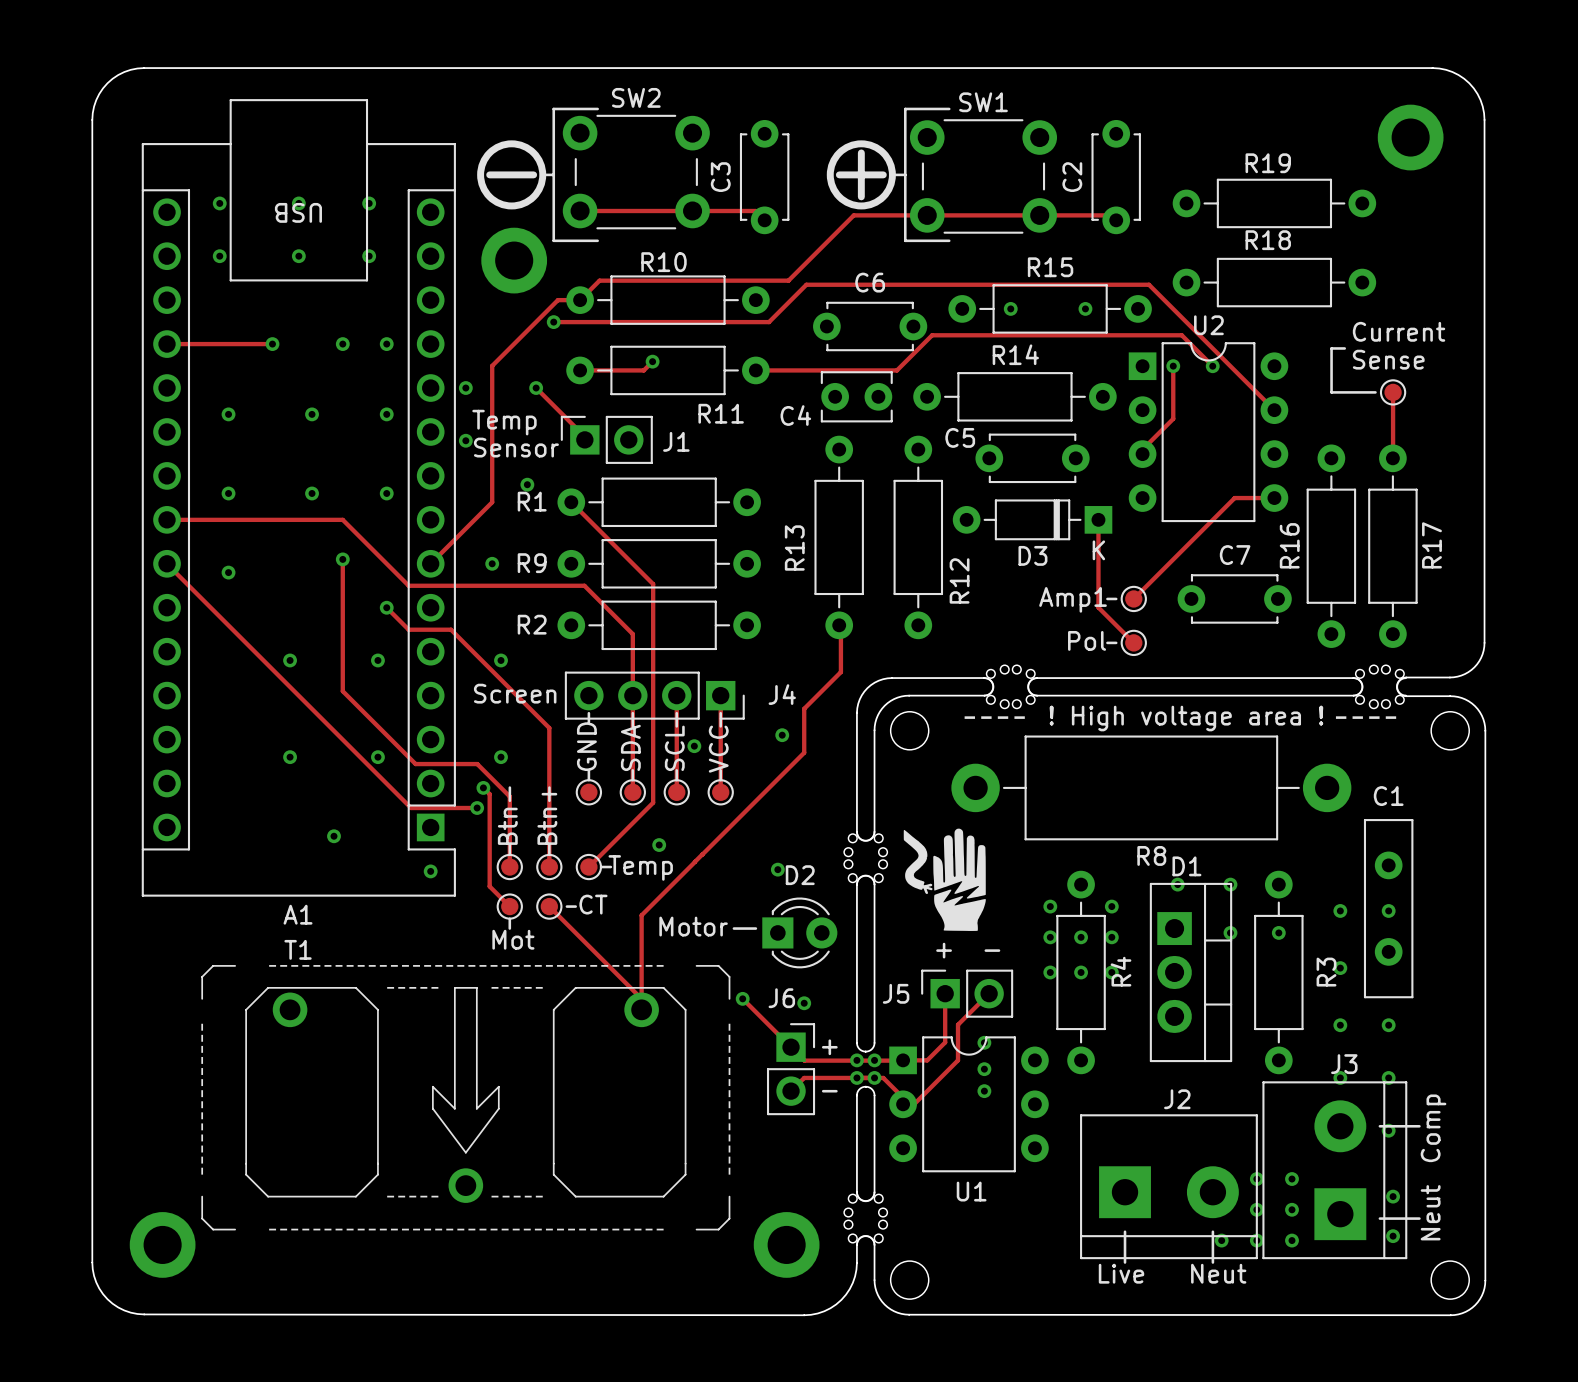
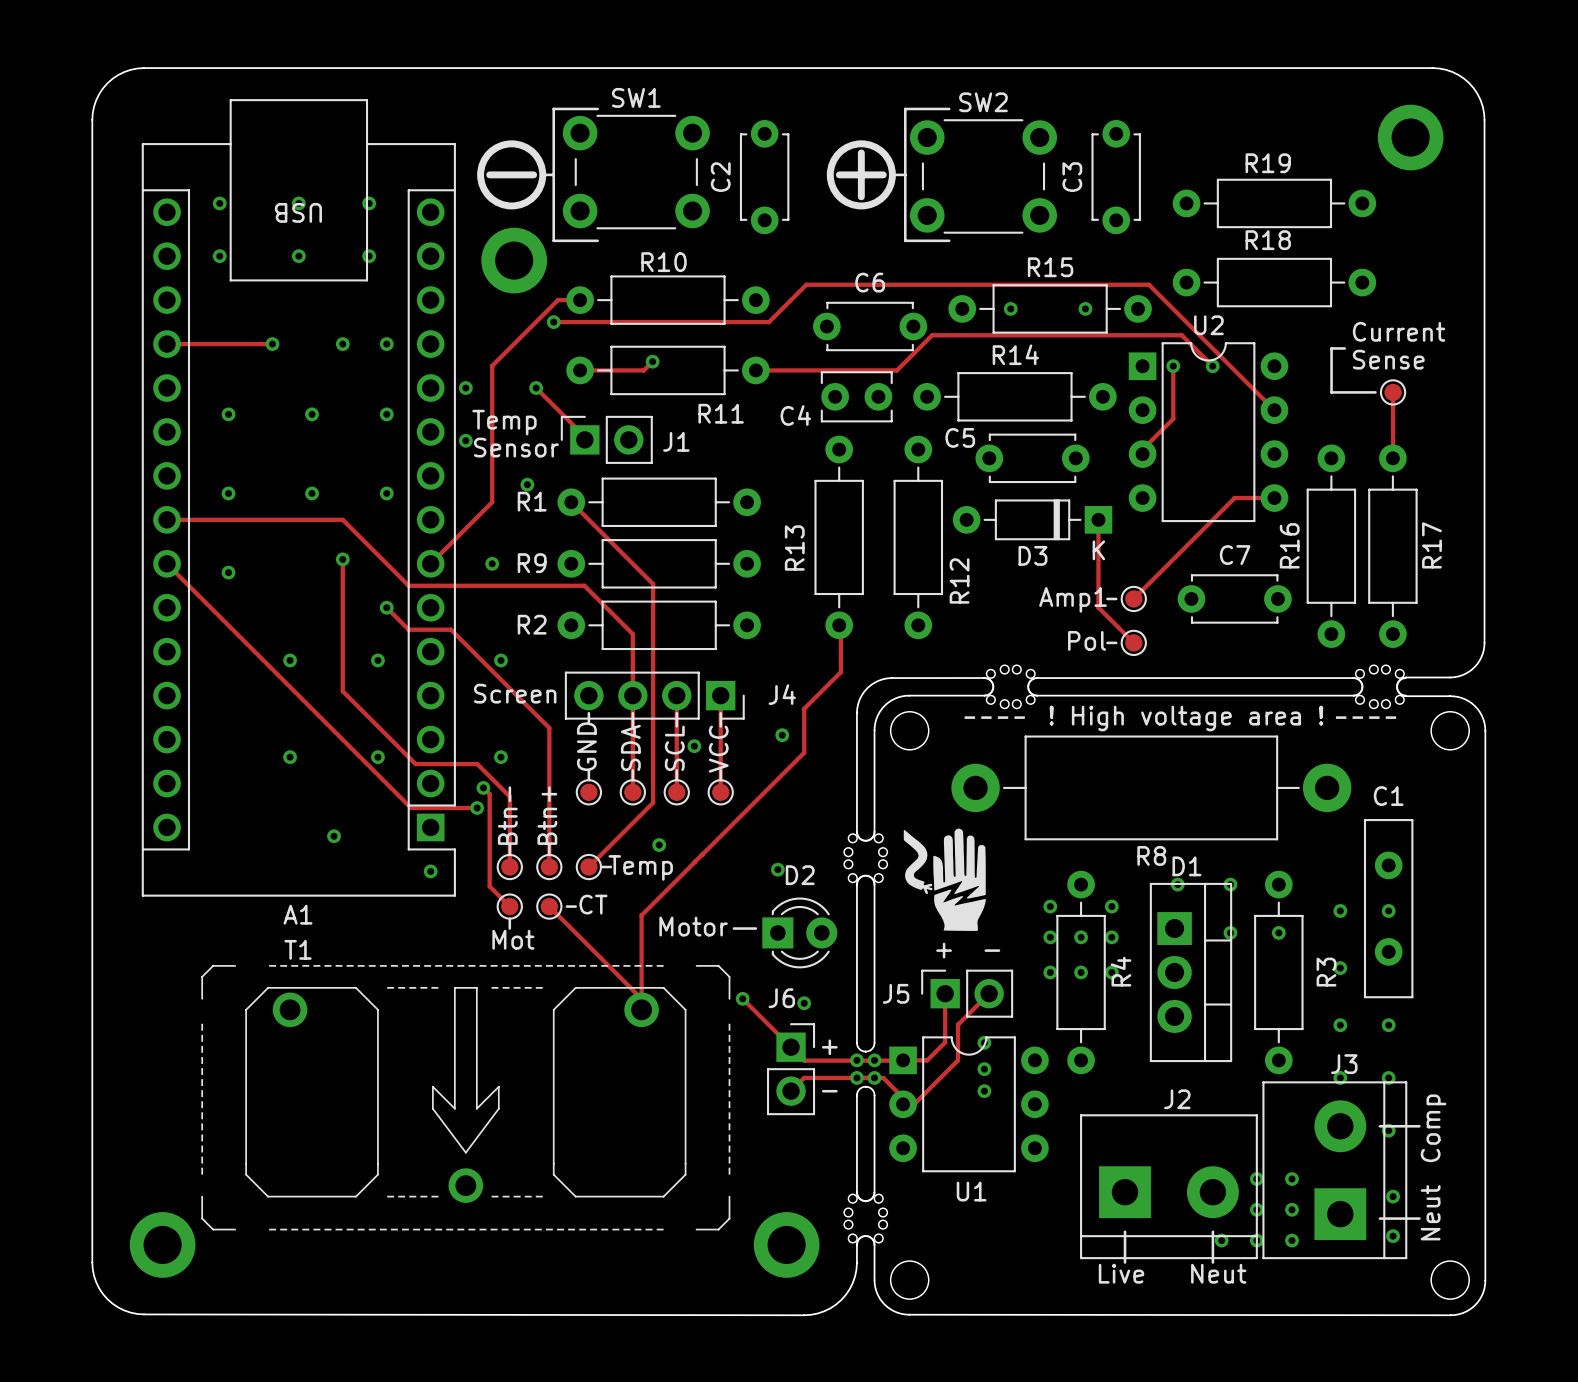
SW2 name: SW2 (636, 97) -> SW1 (636, 97)
SW1 name: SW1 (983, 102) -> SW2 (983, 102)
C3 name: C3 (720, 177) -> C2 (720, 177)
C2 name: C2 (1072, 177) -> C3 (1072, 177)
track: (580, 210) (755, 210) (764, 220) -> none
track: (1116, 220) (1111, 215) (853, 215) (788, 280) (599, 280) (580, 300) -> none

